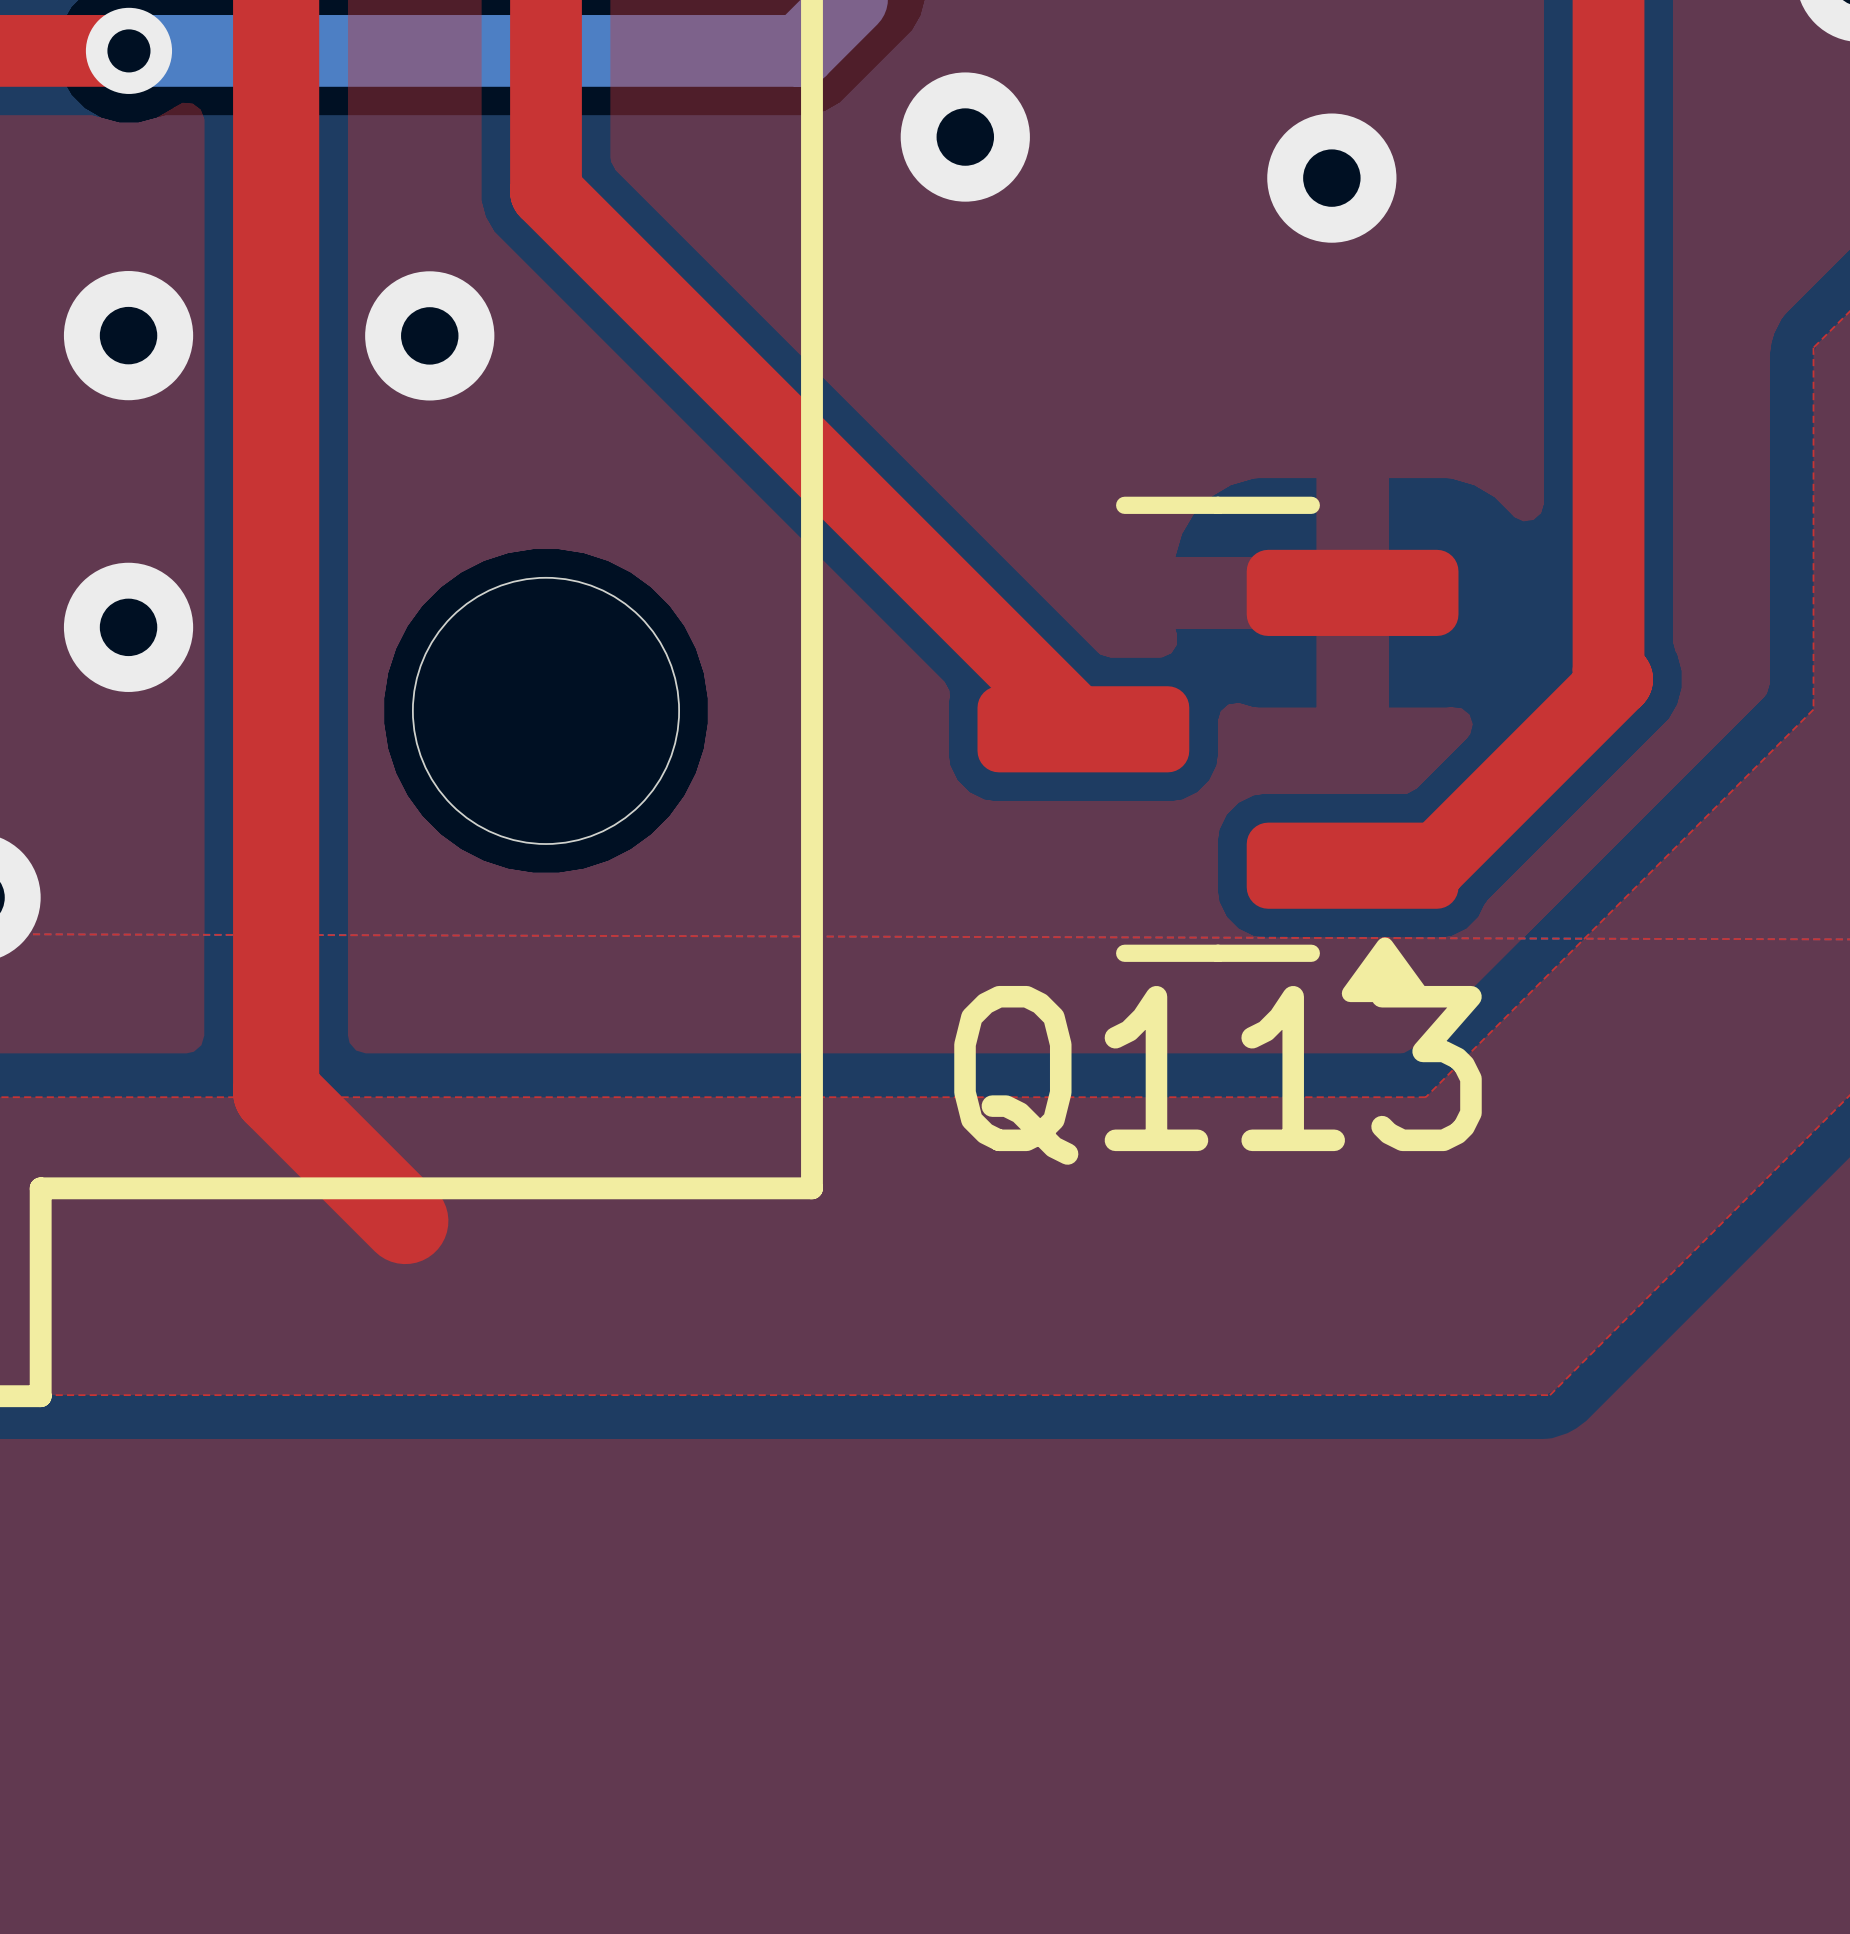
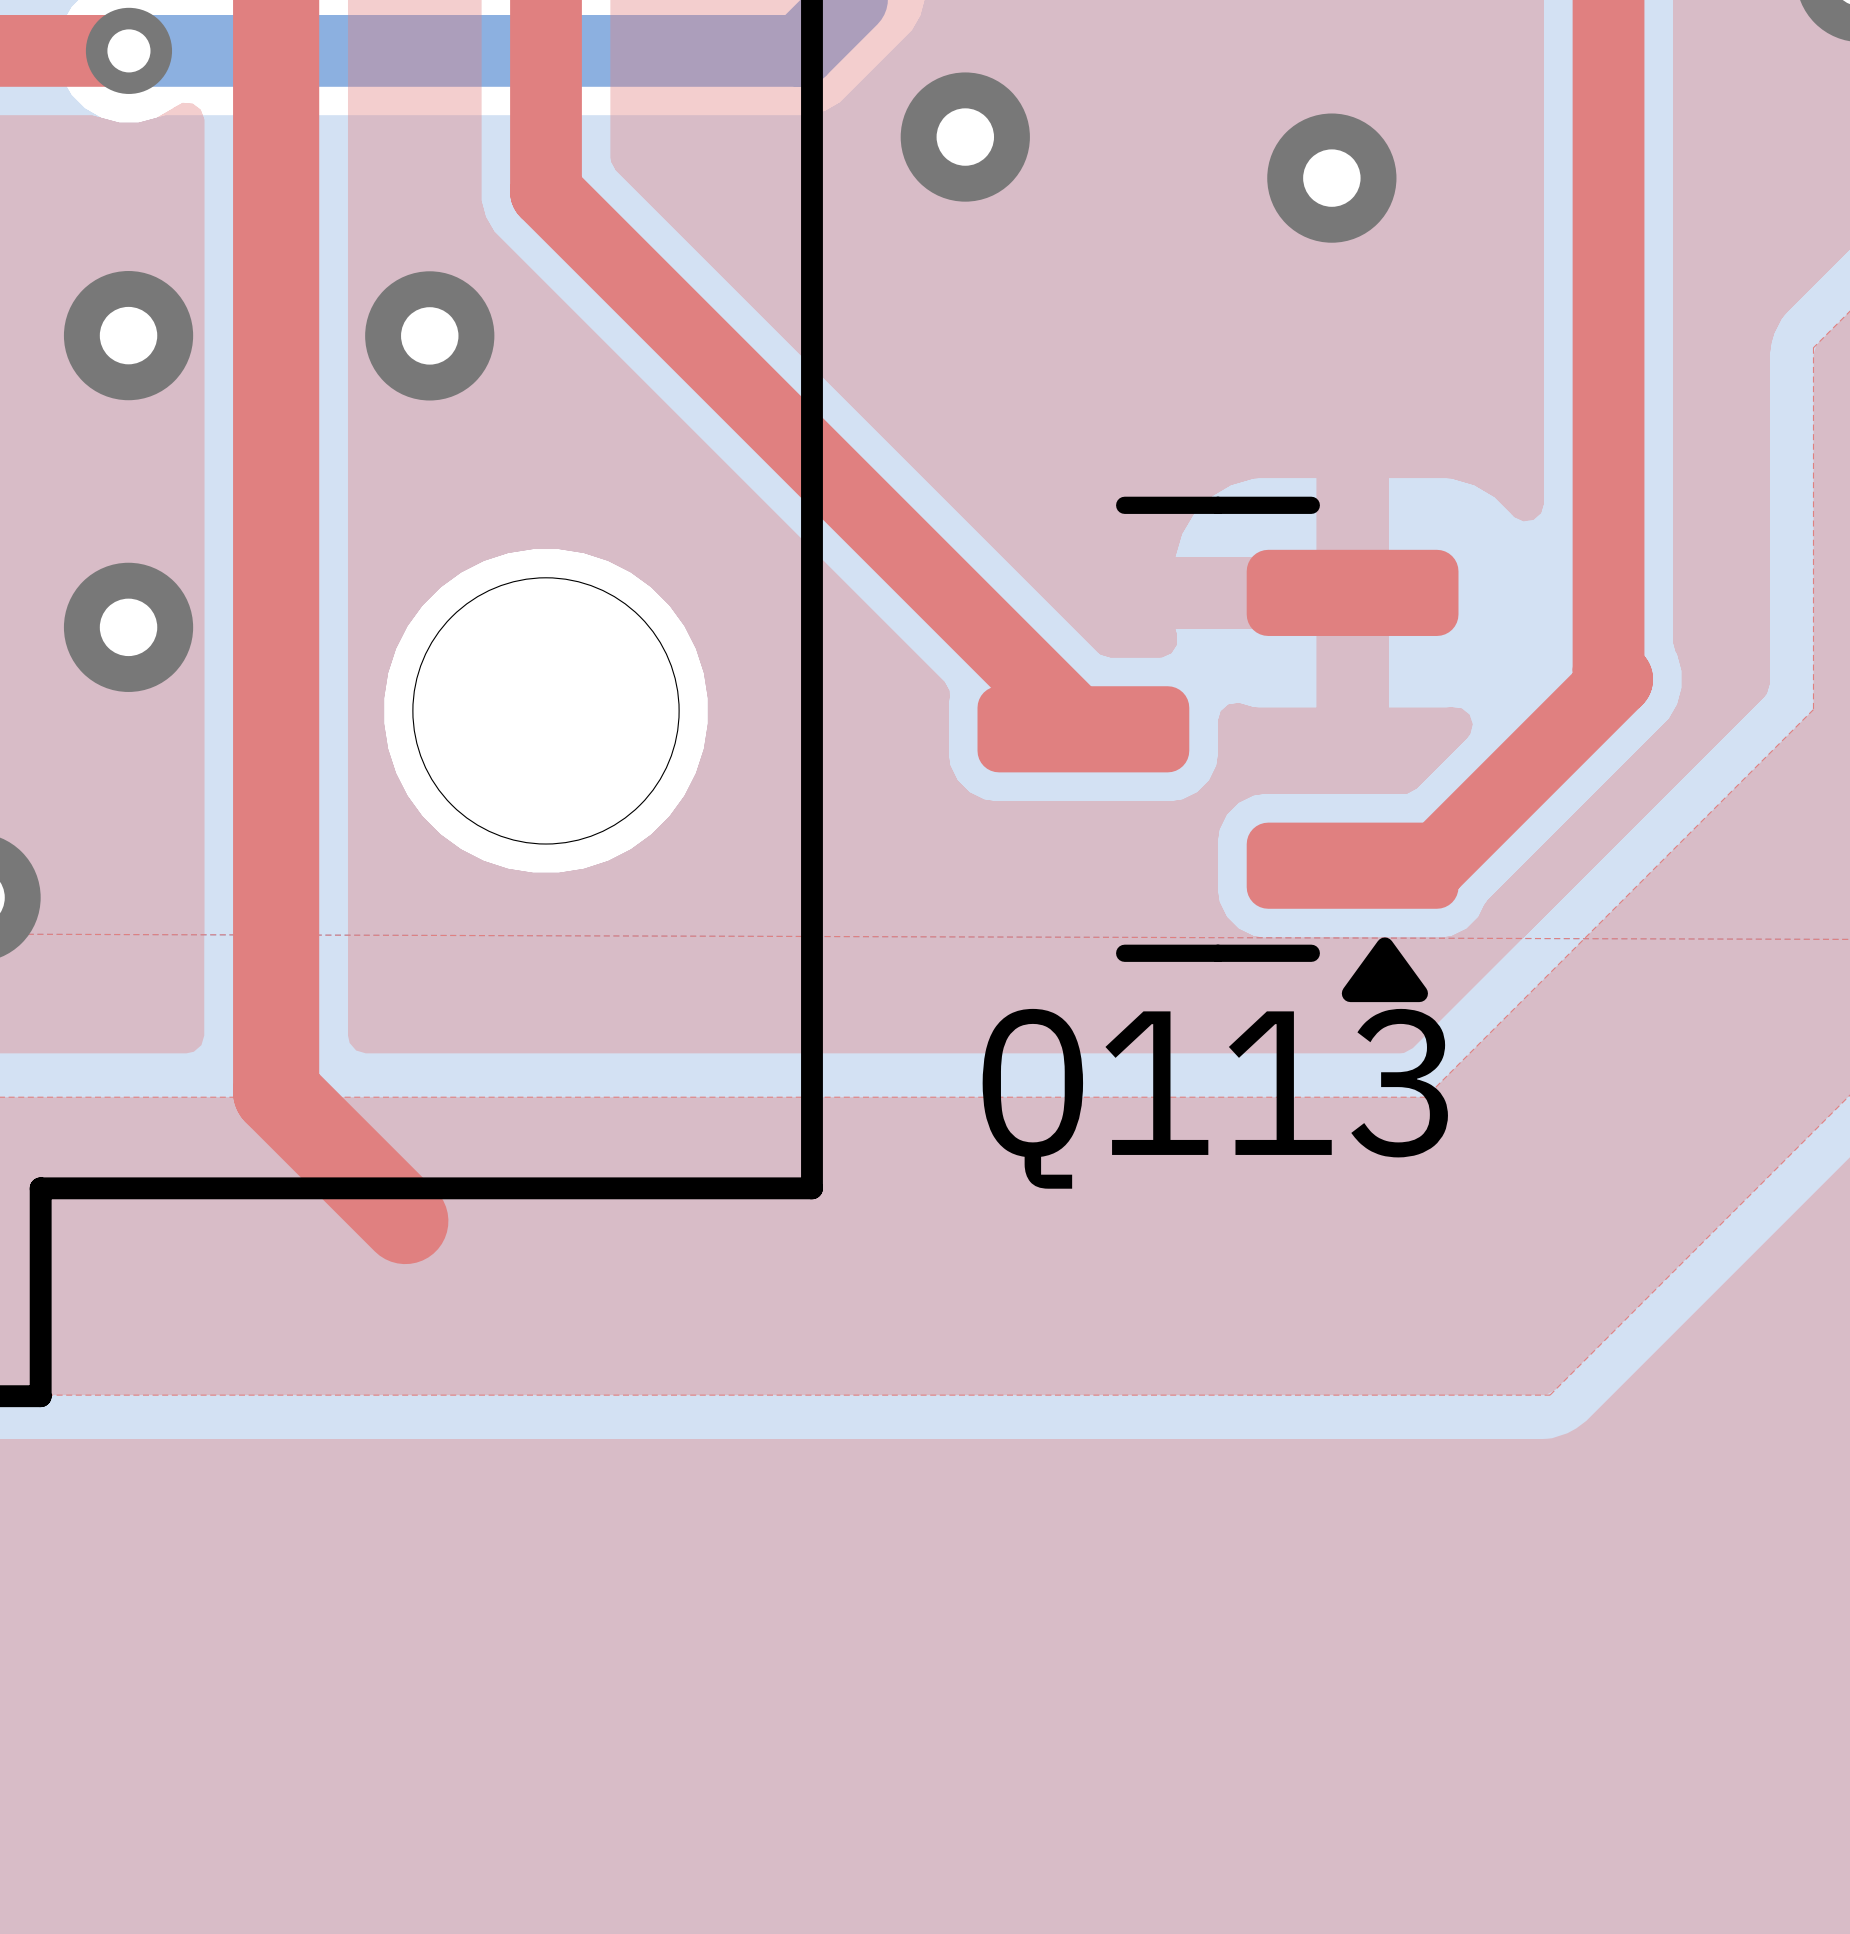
Q113 name position: Q113 (1217, 1075) -> Q113 (1215, 1098)

